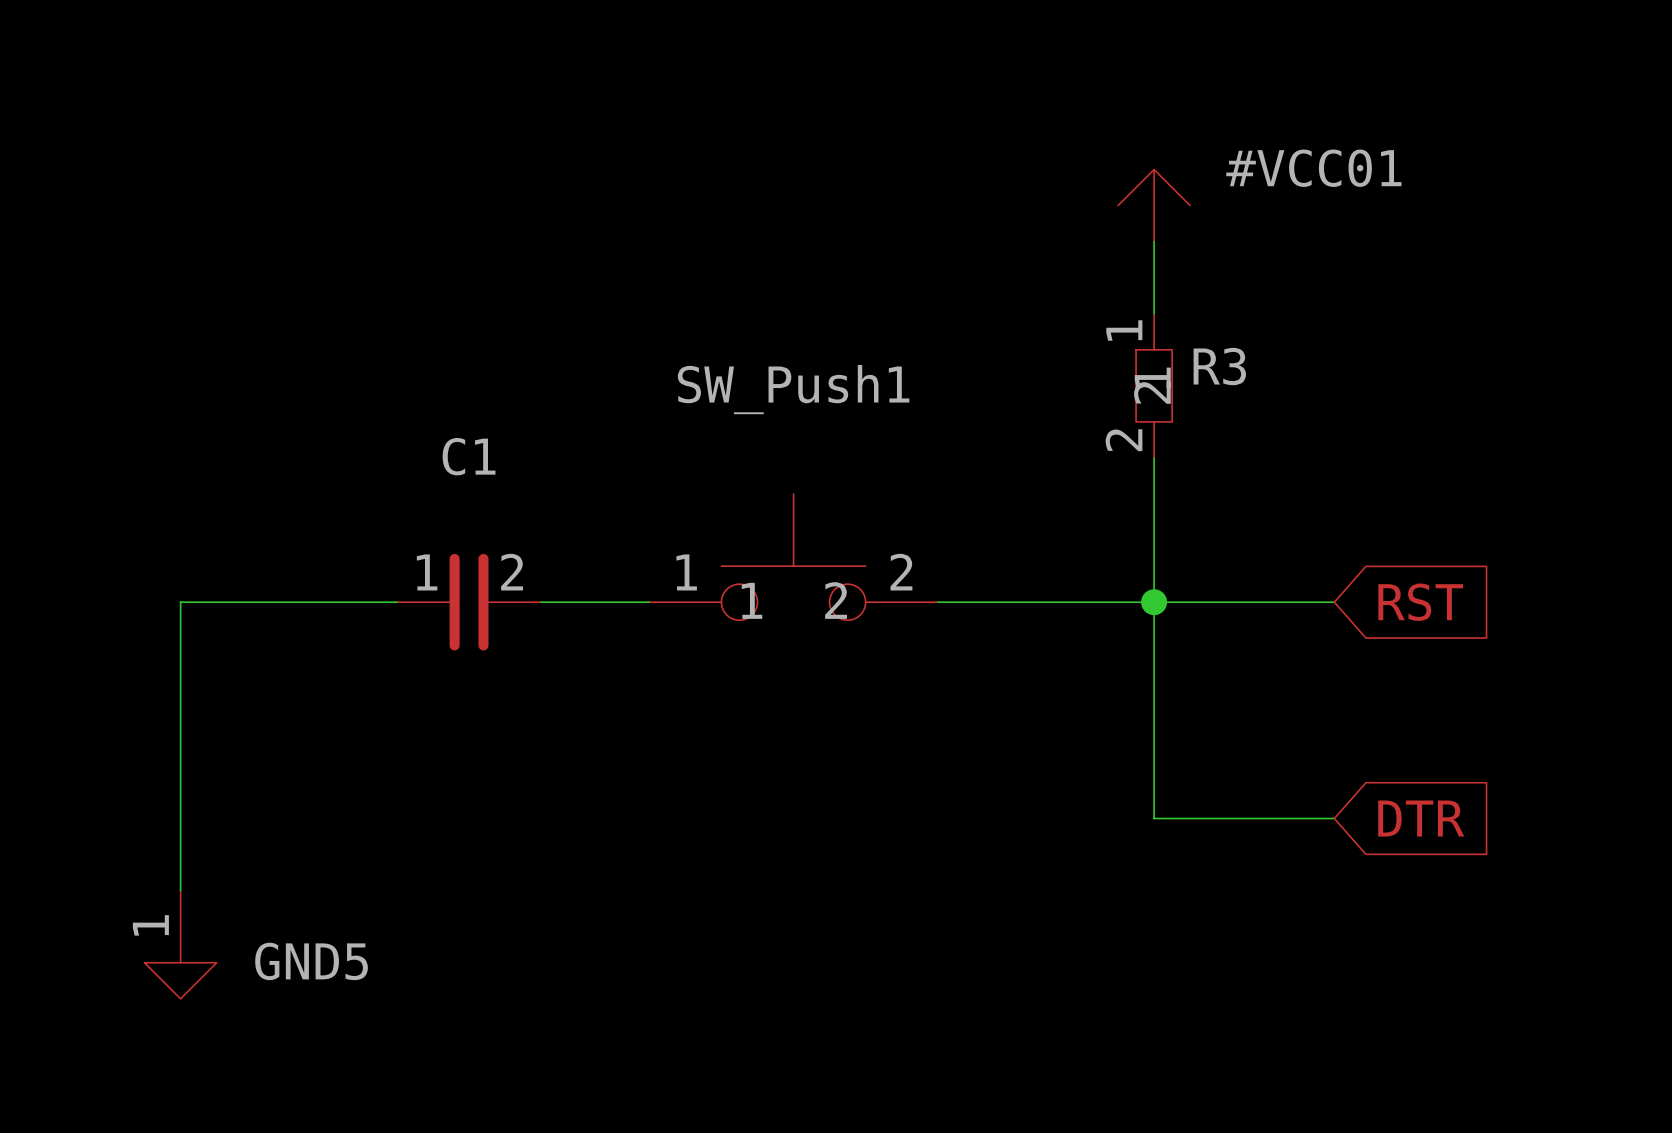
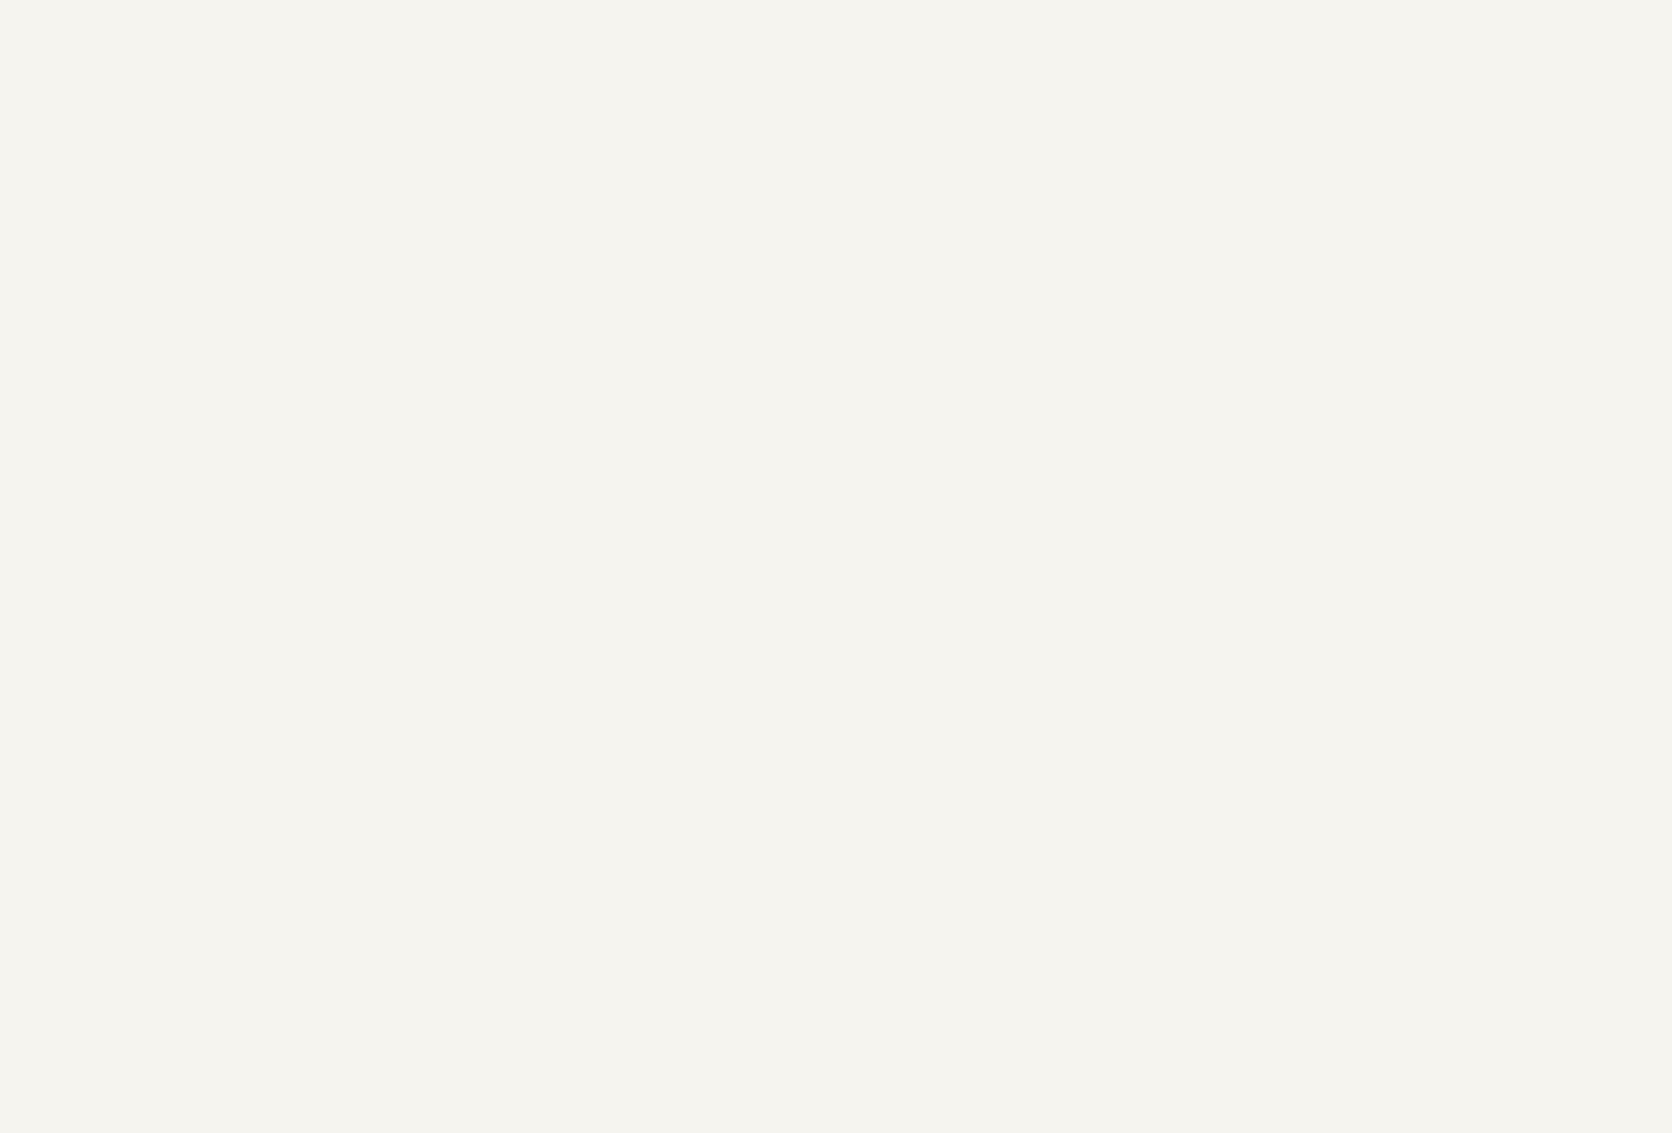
#VCC01: (1154, 205) -> none
wire: (1154, 241) (1154, 313) -> none
R3: (1154, 385) -> none
wire: (1154, 457) (1154, 818) (1334, 818) -> none
SW_Push1: (793, 557) -> none
wire: (396, 602) (180, 602) (180, 890) -> none
C1: (469, 602) -> none
wire: (541, 602) (649, 602) -> none
wire: (937, 602) (1334, 602) -> none
junction: (1154, 602) -> none
global label: RST (1420, 602) -> none
global label: DTR (1421, 818) -> none
GND5: (180, 944) -> none

